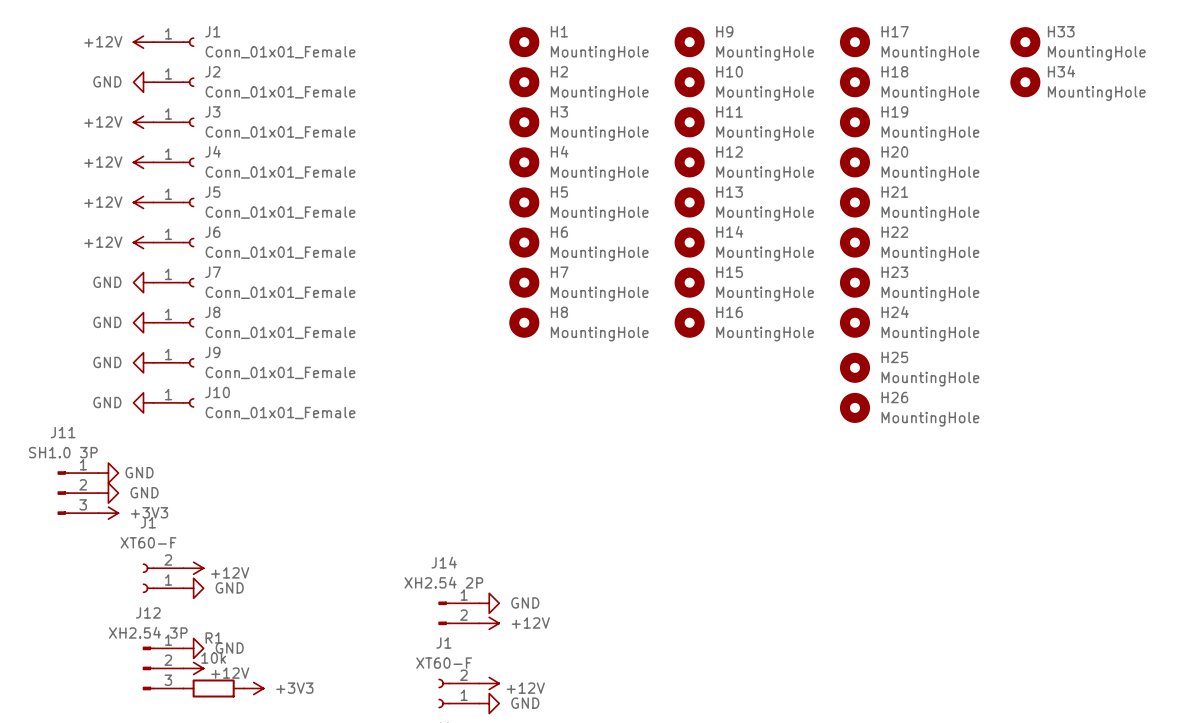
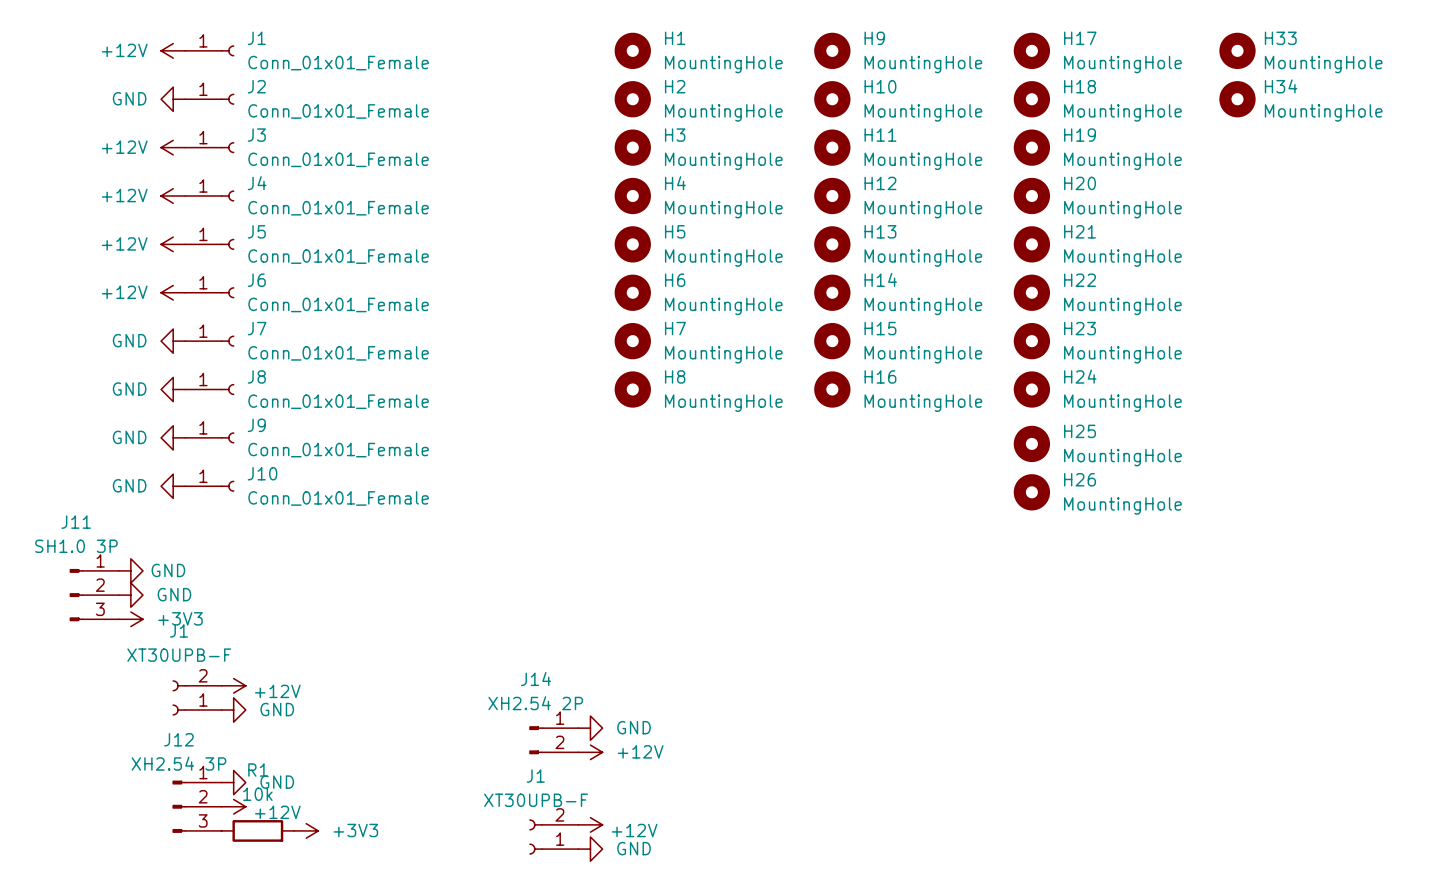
J1 value: XT60-F (148, 542) -> XT30UPB-F (179, 655)
J1 value: XT60-F (444, 663) -> XT30UPB-F (536, 800)

